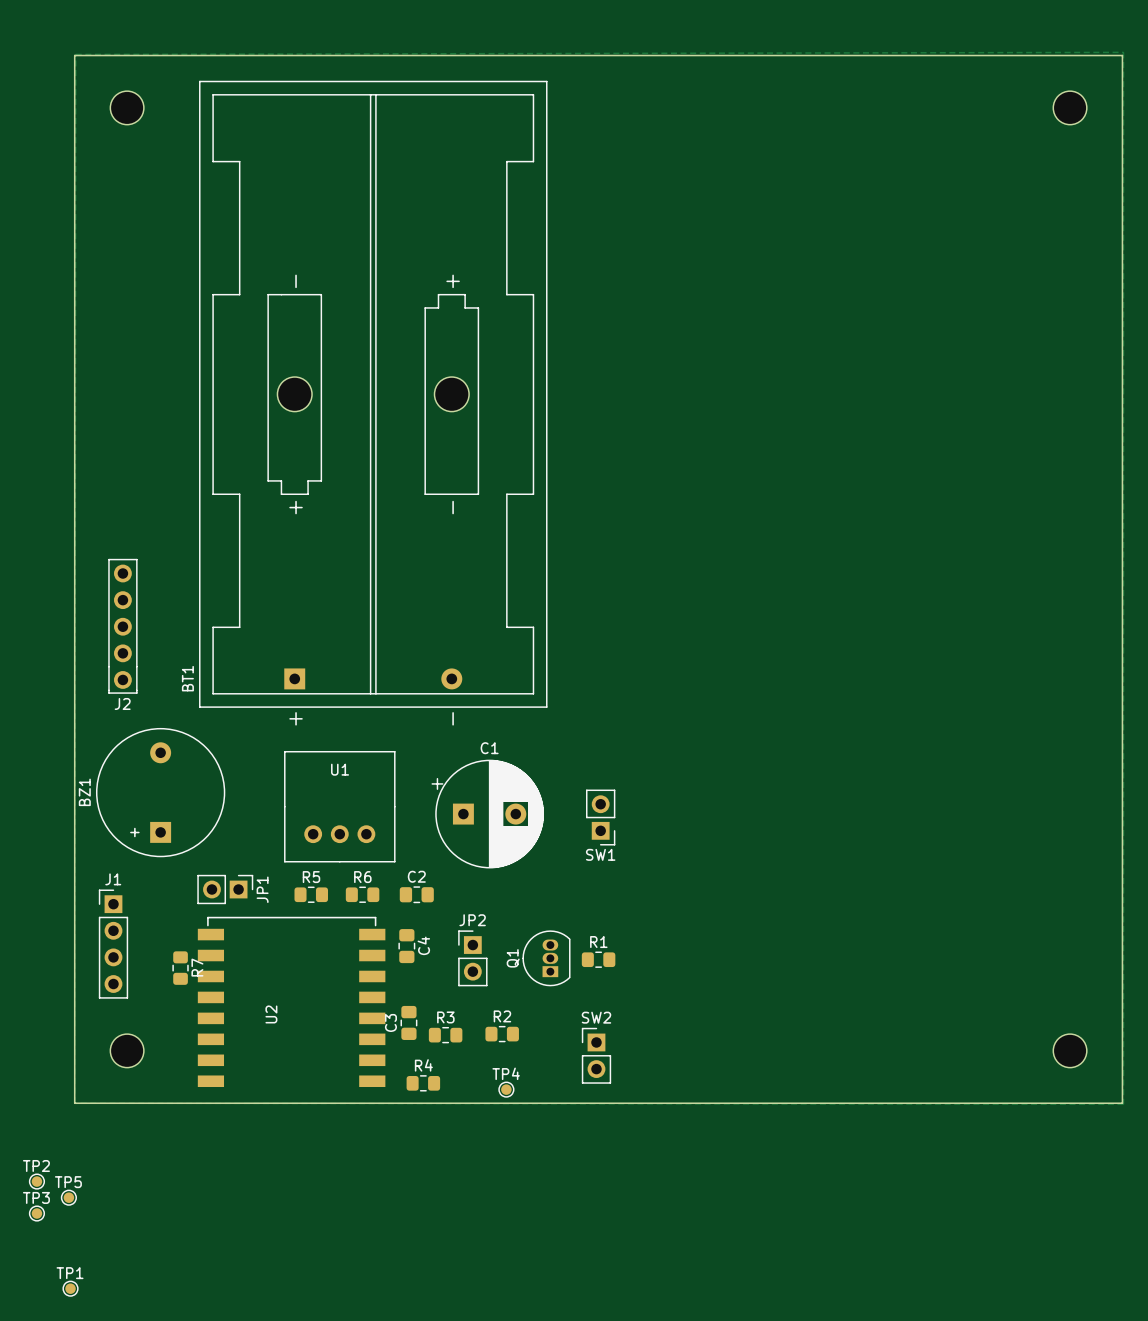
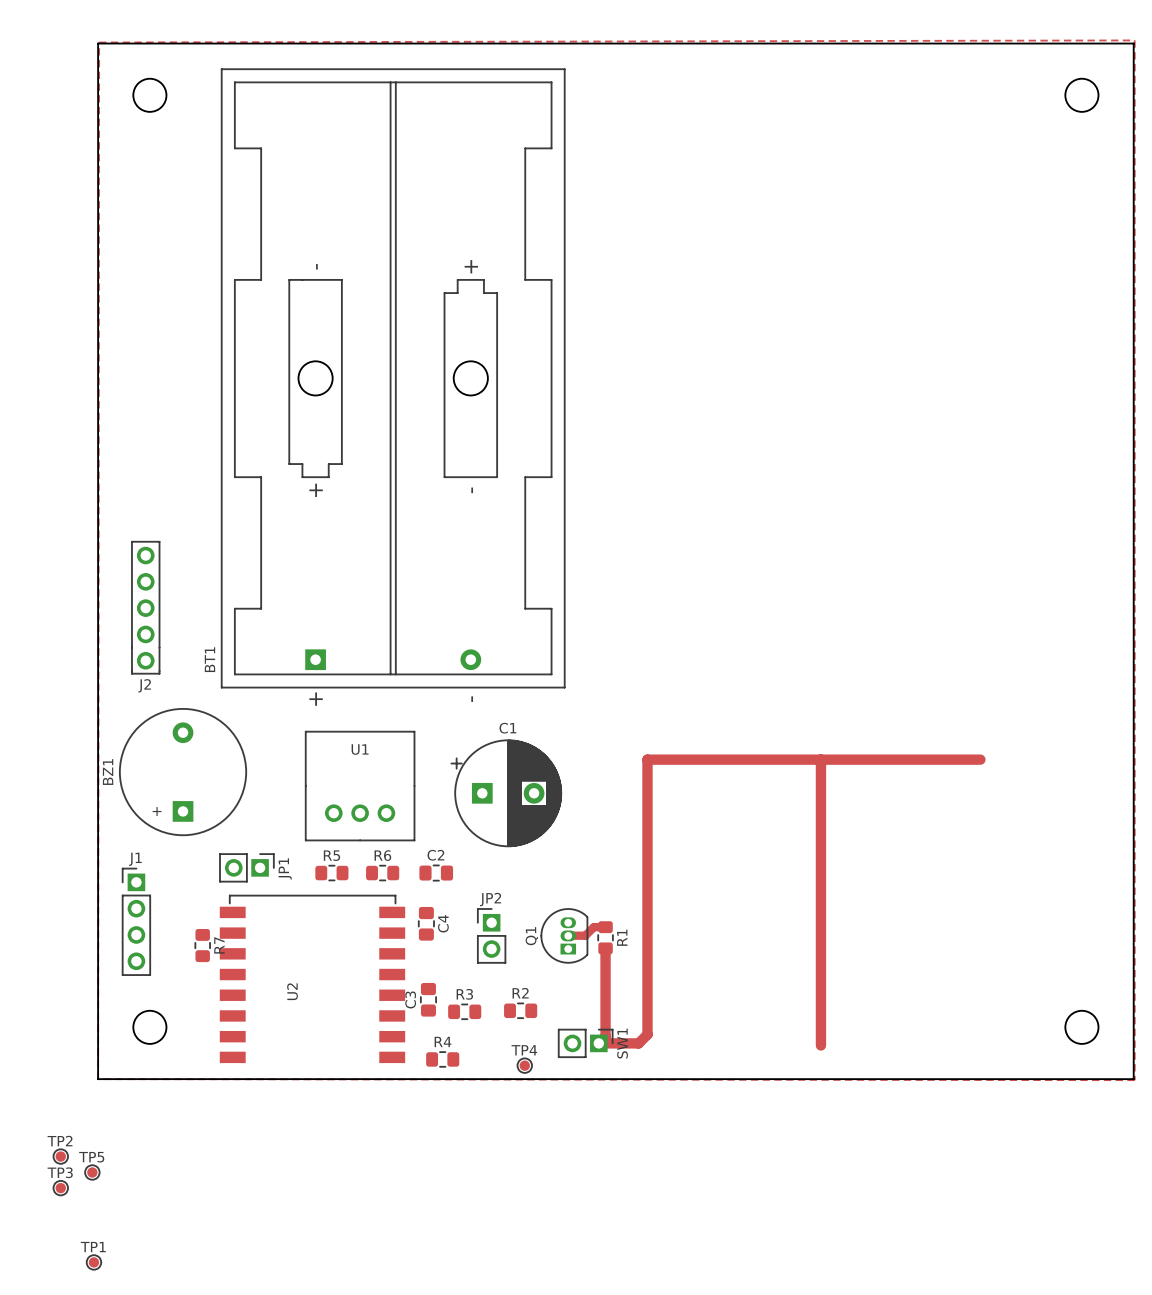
track: none -> (820, 759) (820, 1045)
track: none -> (980, 759) (647, 759) (647, 1034) (638, 1043) (598, 1043) (605, 1036) (605, 948)
SW1 rotation: 0° (600, 817) -> 90° counterclockwise (585, 1043)
SW1 position: (600, 817) -> (585, 1043)
track: none -> (605, 927) (593, 927) (585, 935) (565, 935)
R1 rotation: 0° (598, 959) -> 90° clockwise (605, 937)
SW2: (596, 1055) -> none

